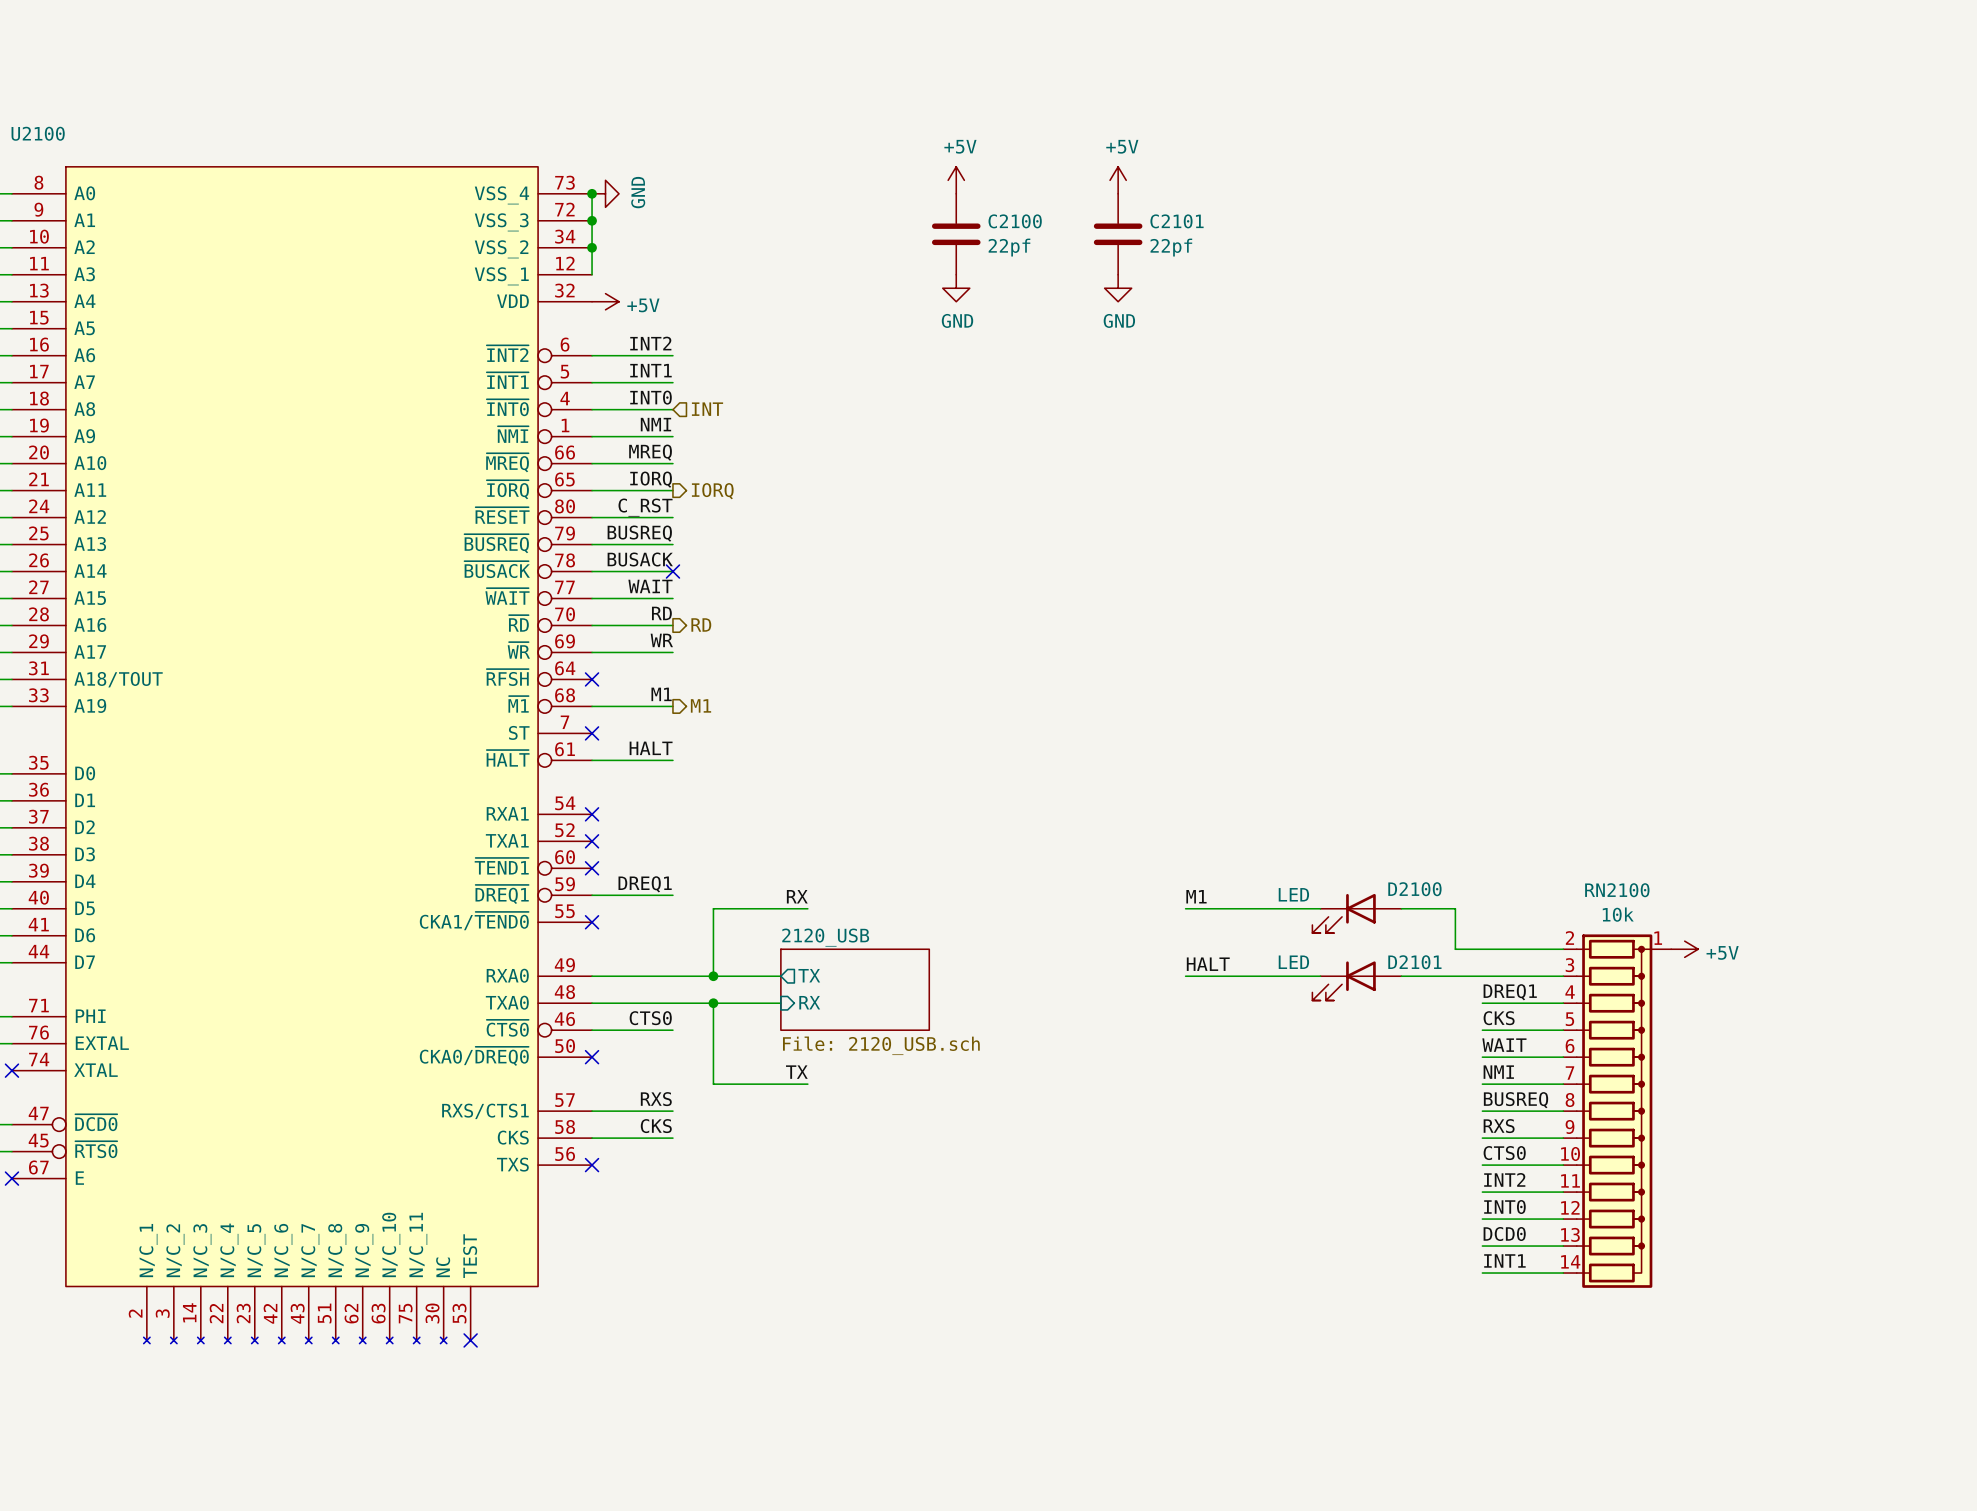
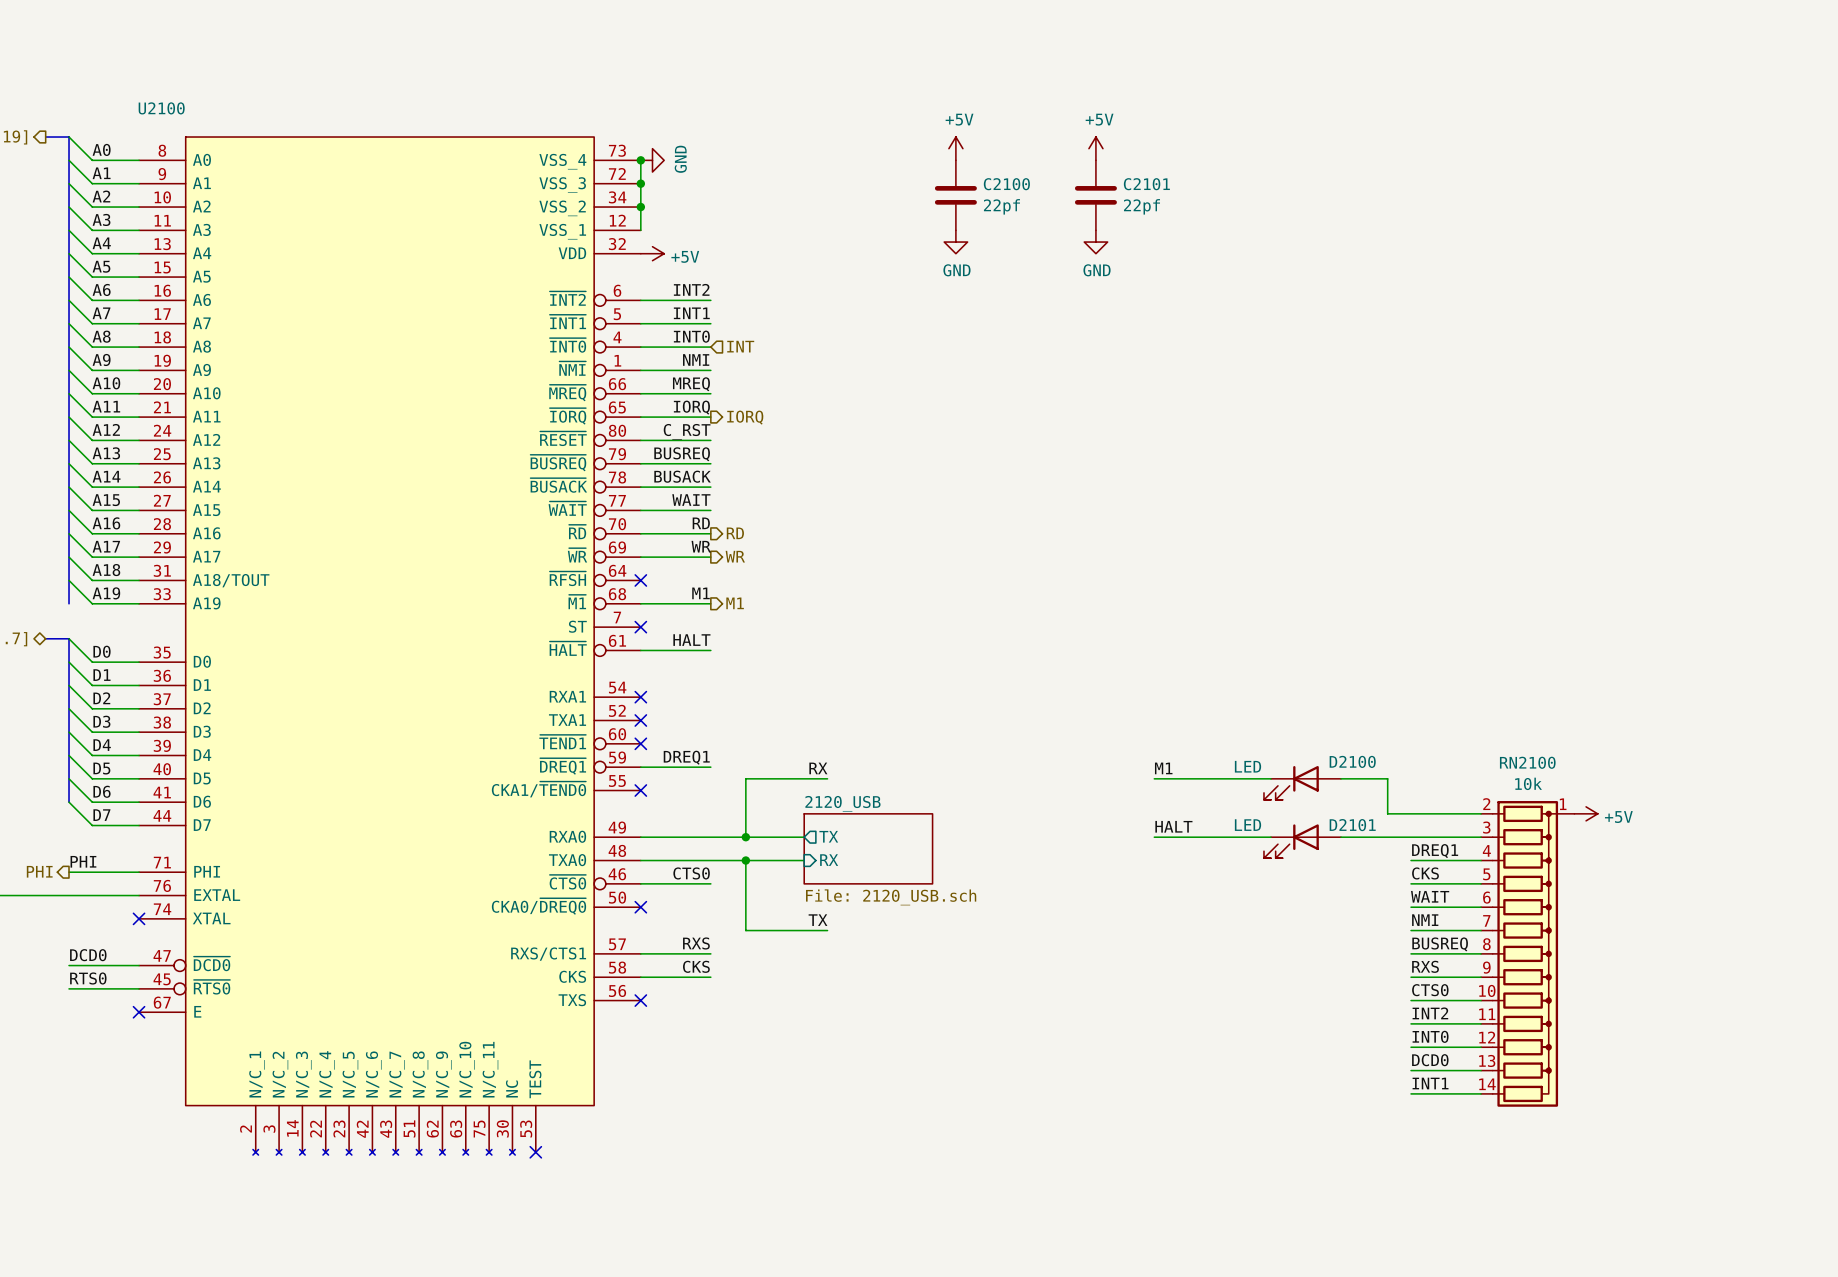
no-connect mark: (672, 571) -> none
hierarchical label: none -> WR (735, 556)

